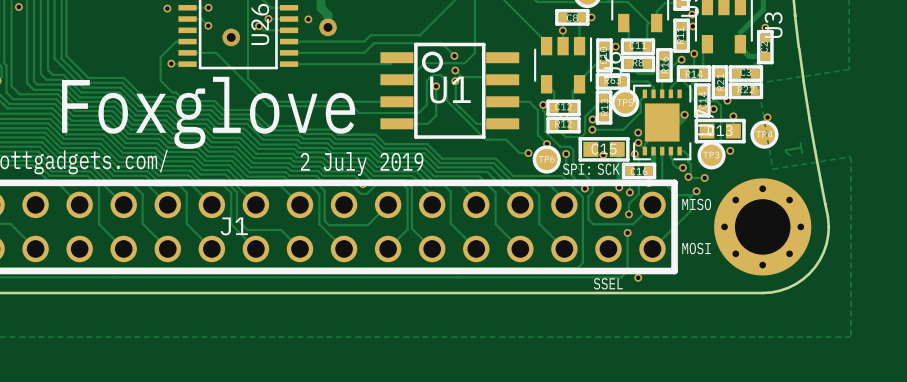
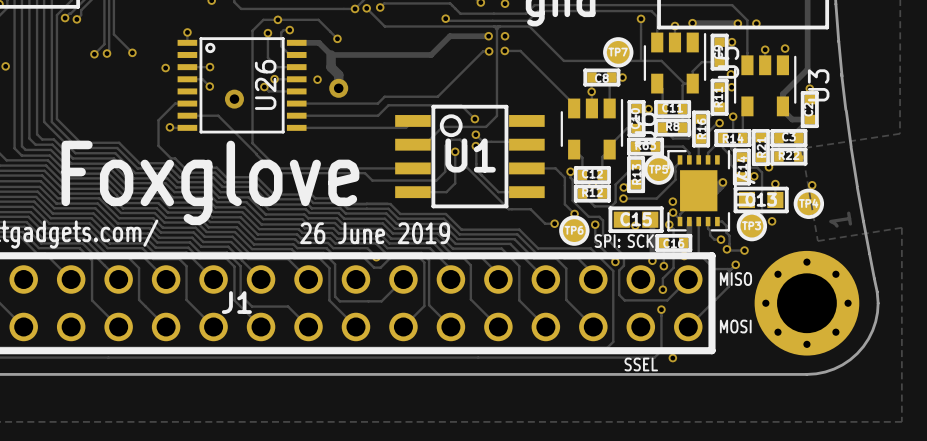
text: 2 July 2019 (362, 163) -> 26 June 2019 (375, 233)

